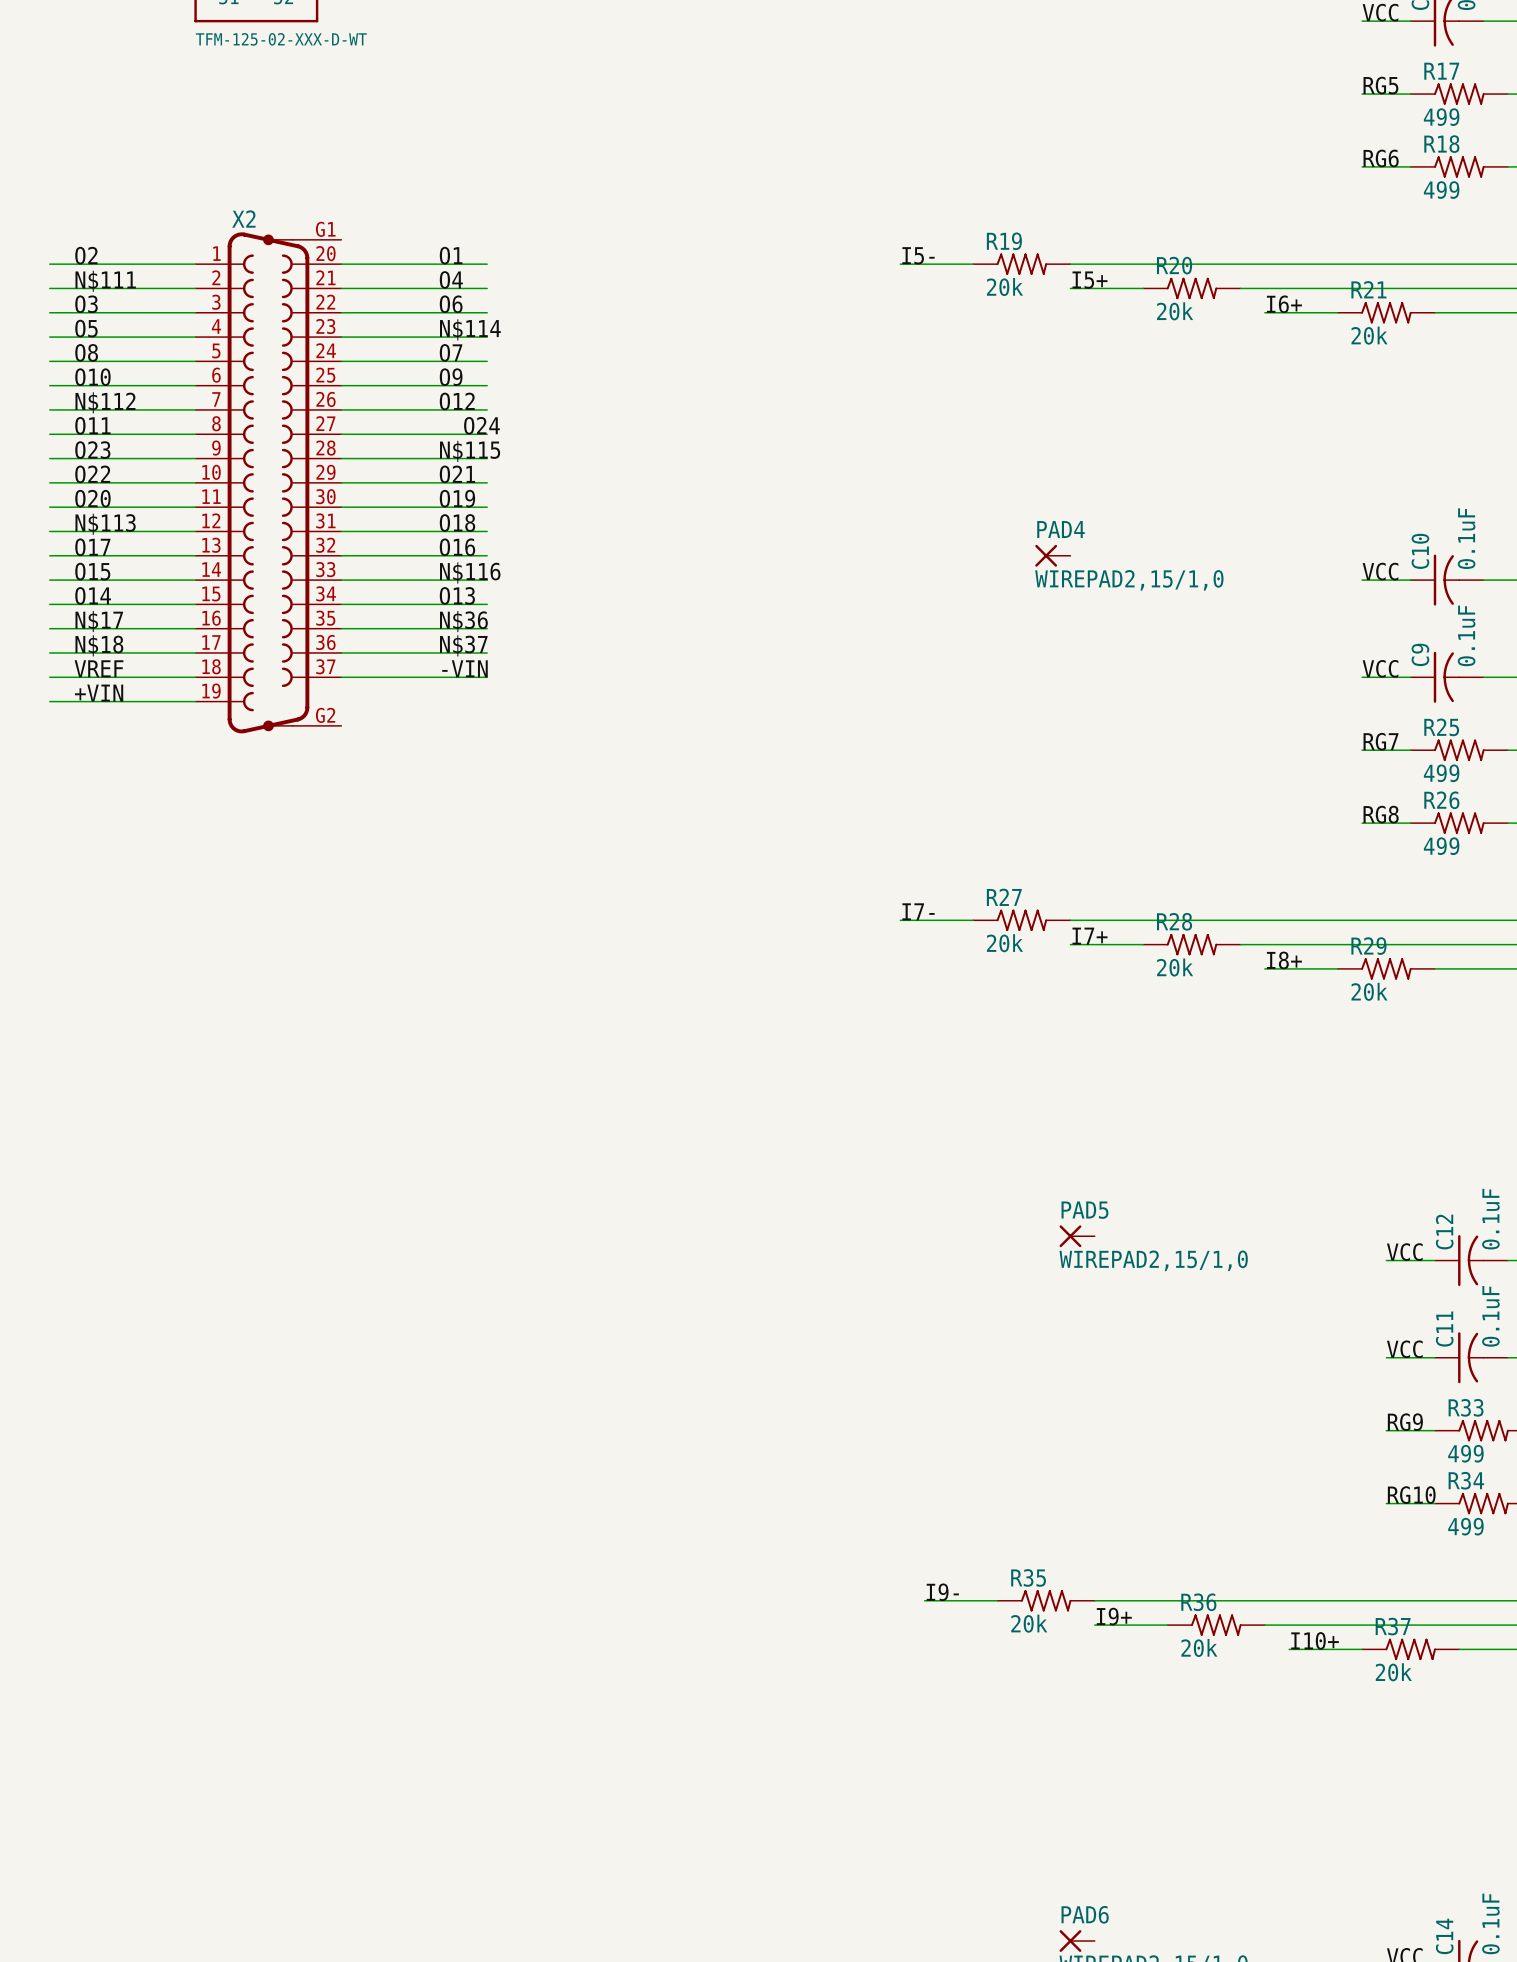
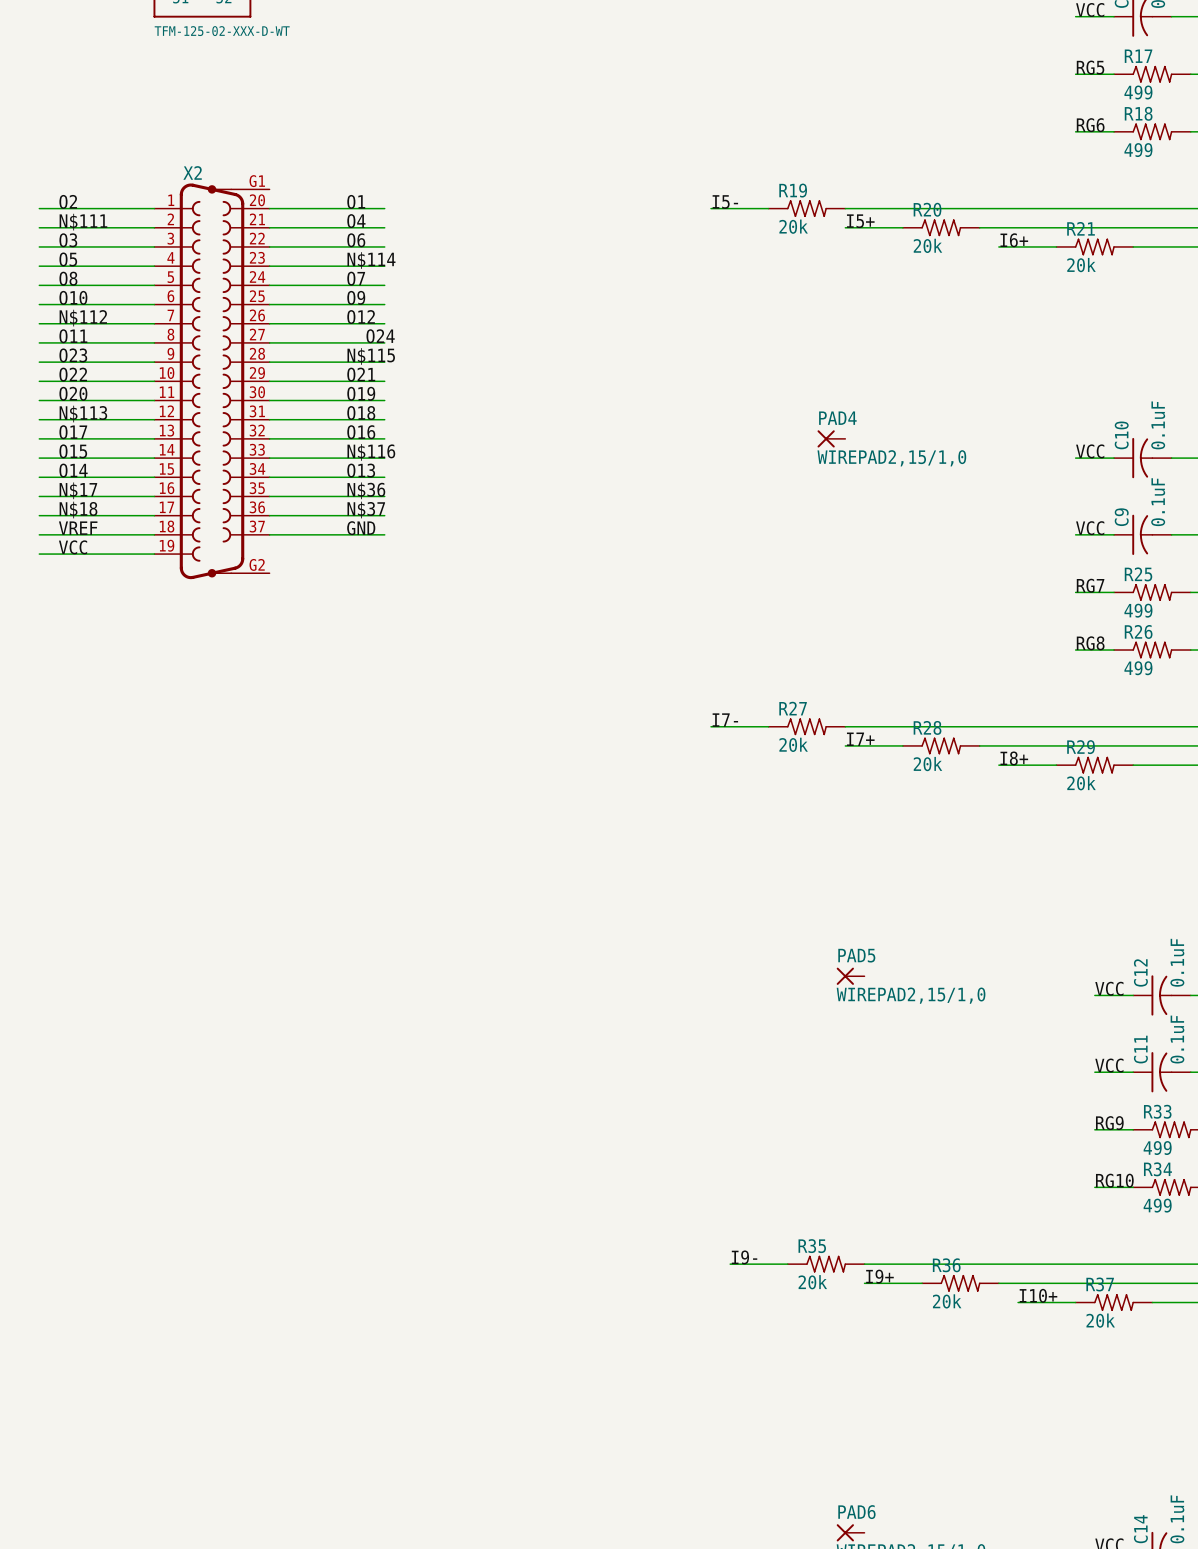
label: -VIN (464, 668) -> GND (361, 528)
label: +VIN (99, 693) -> VCC (73, 547)

